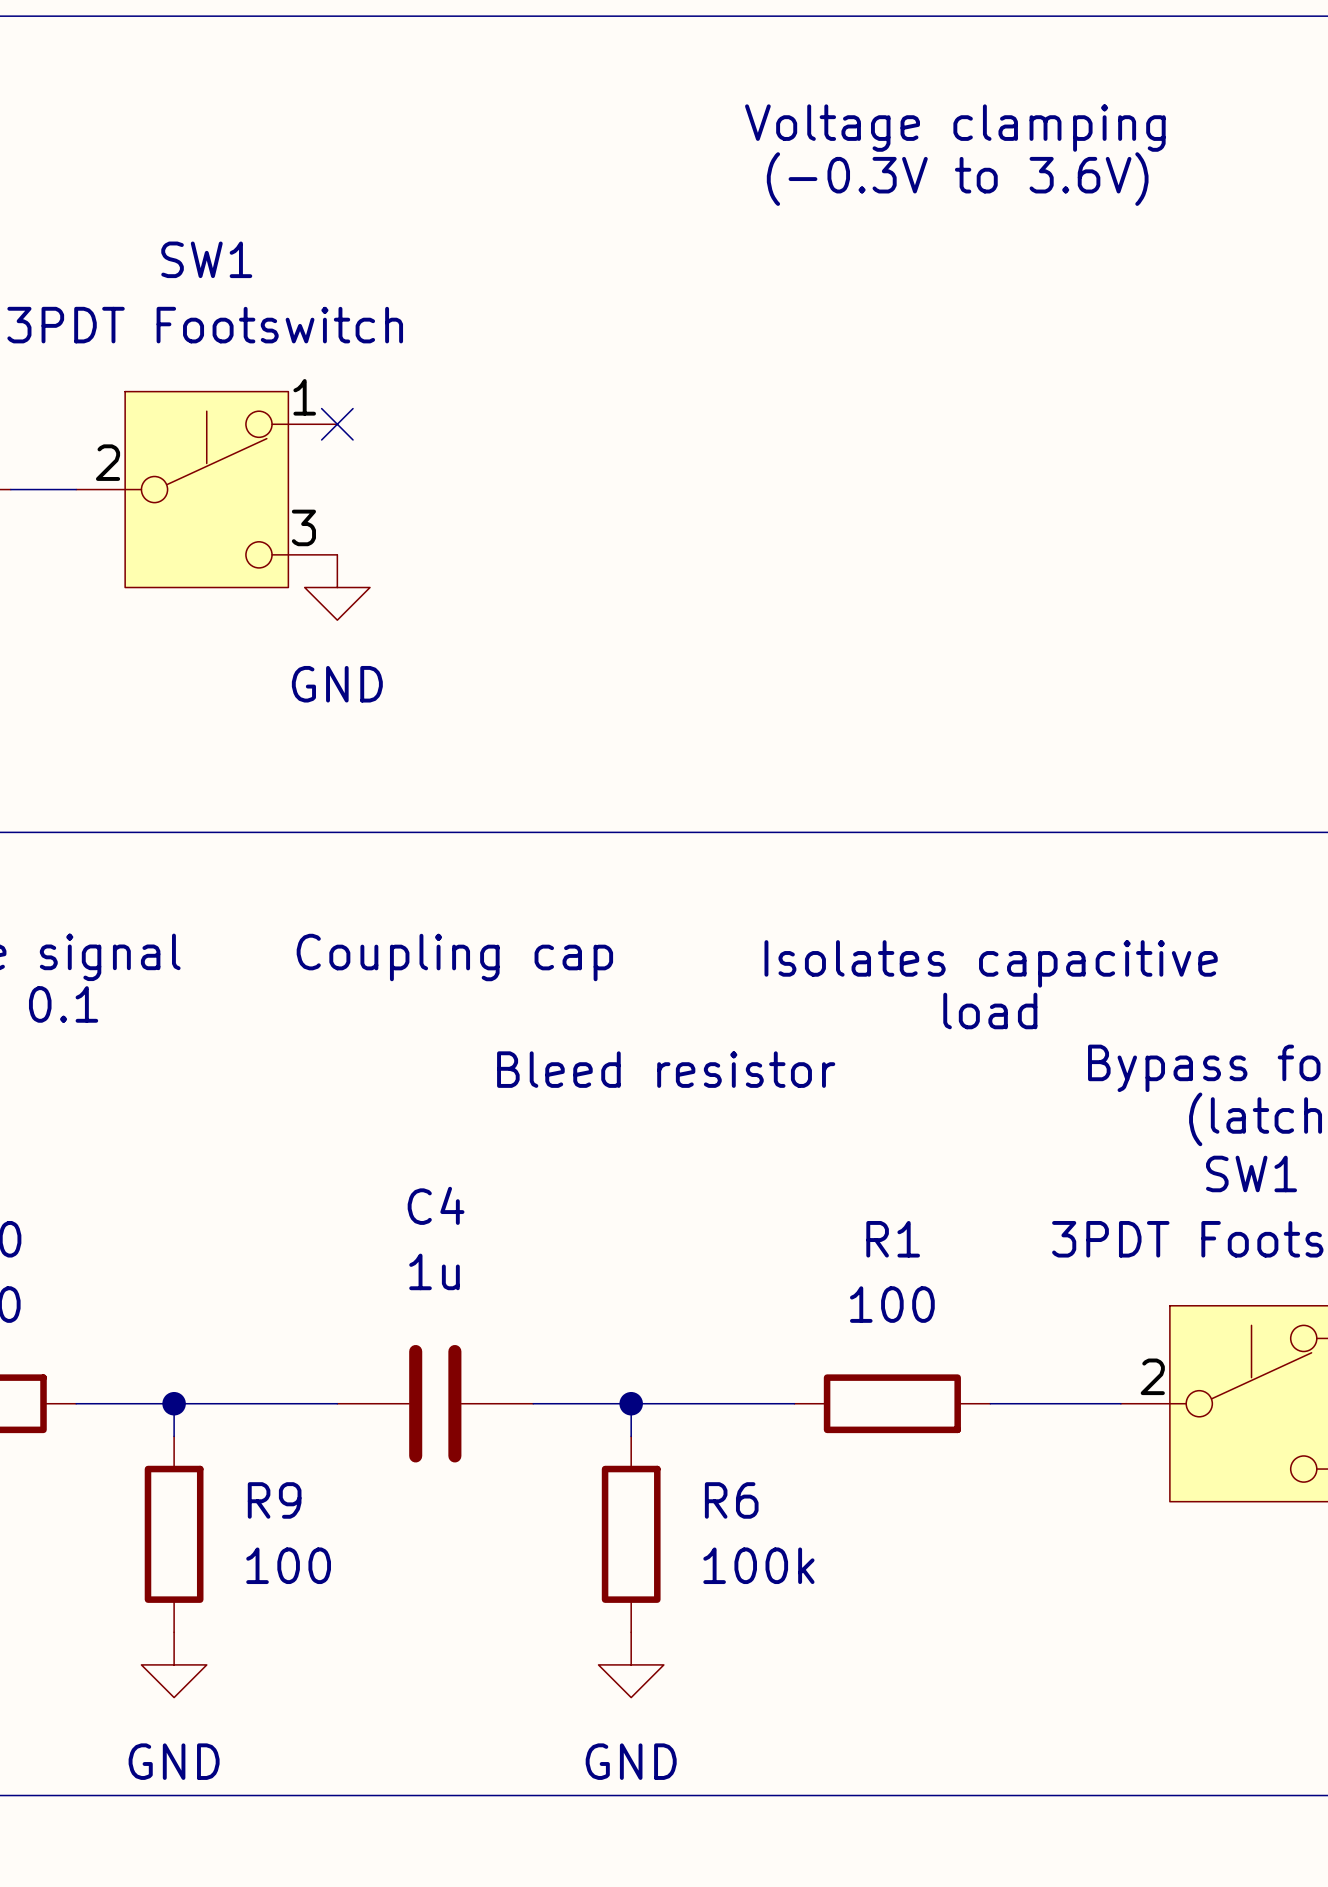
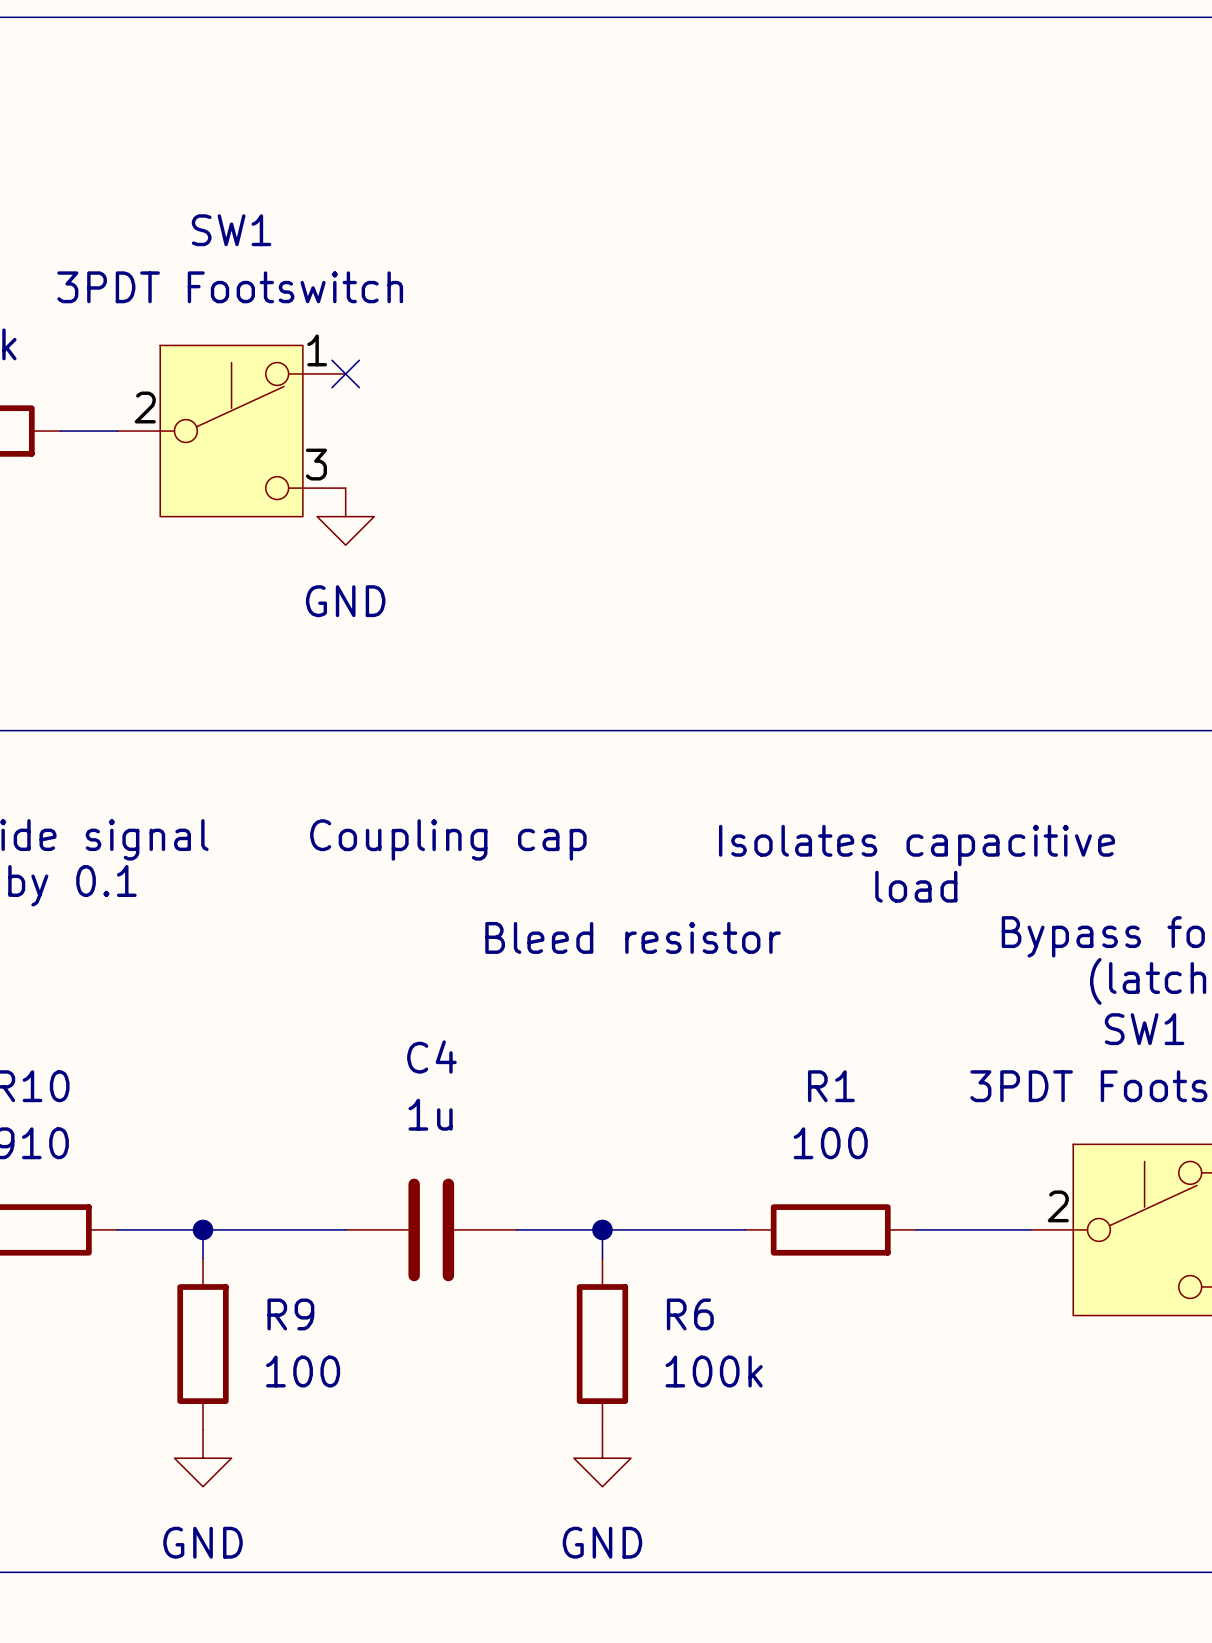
text: Voltage clamping (955, 128) -> none
text: (-0.3V to 3.6V) (957, 179) -> none

